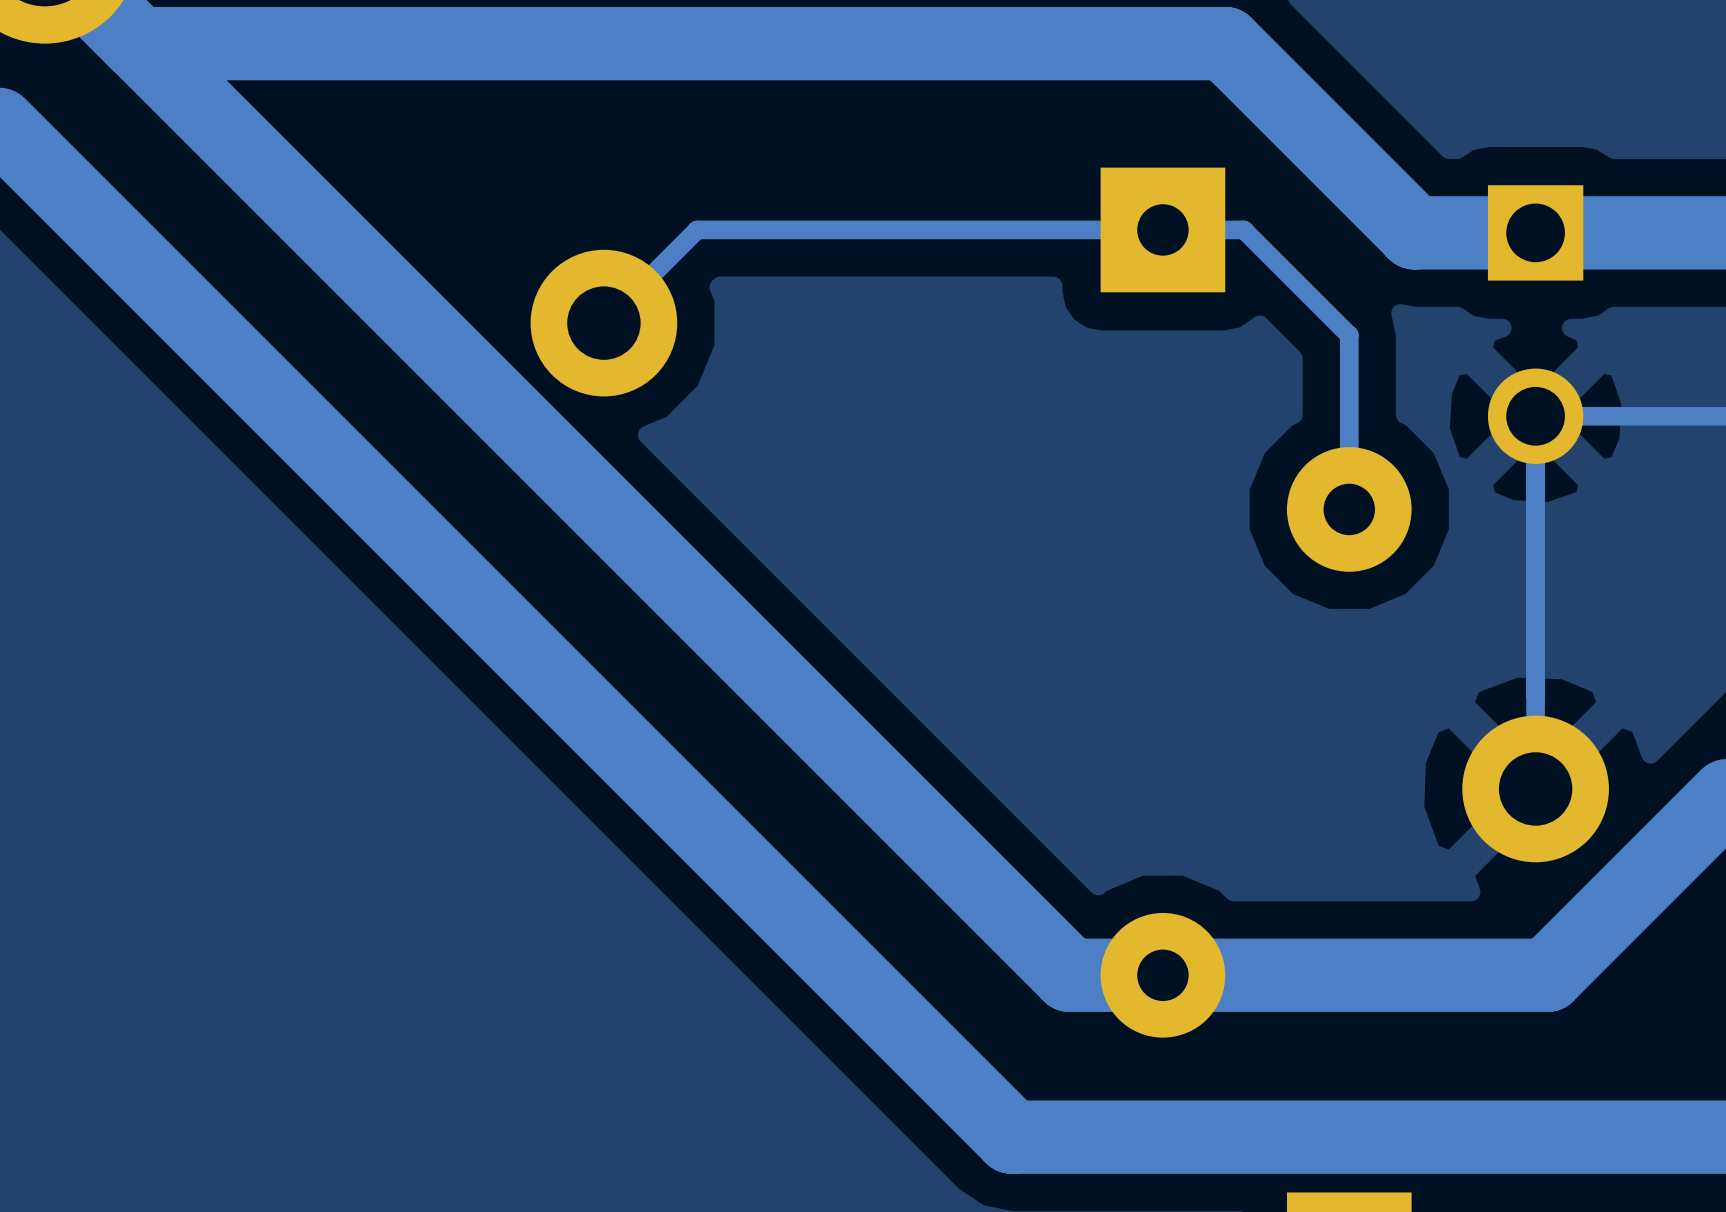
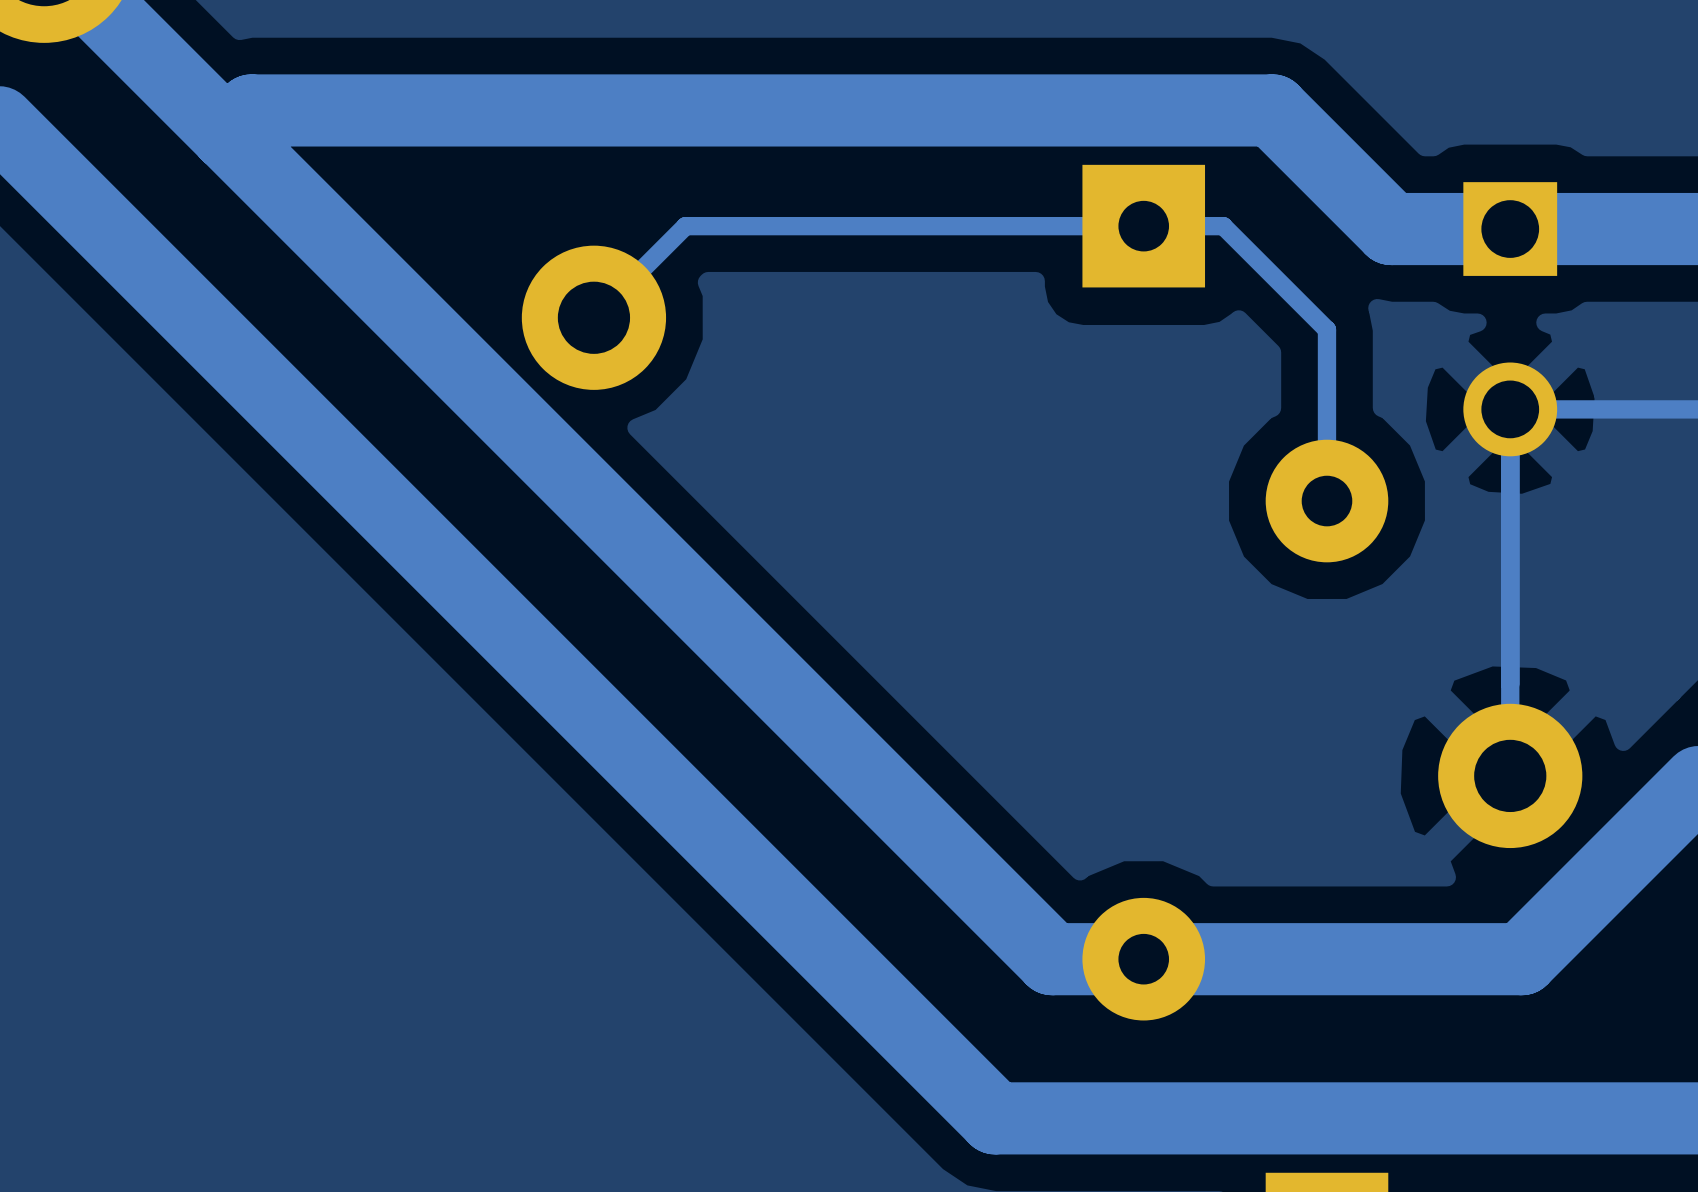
track: (138, 43) (1225, 43) (1293, 112) -> (227, 134) (251, 110) (1272, 110)

